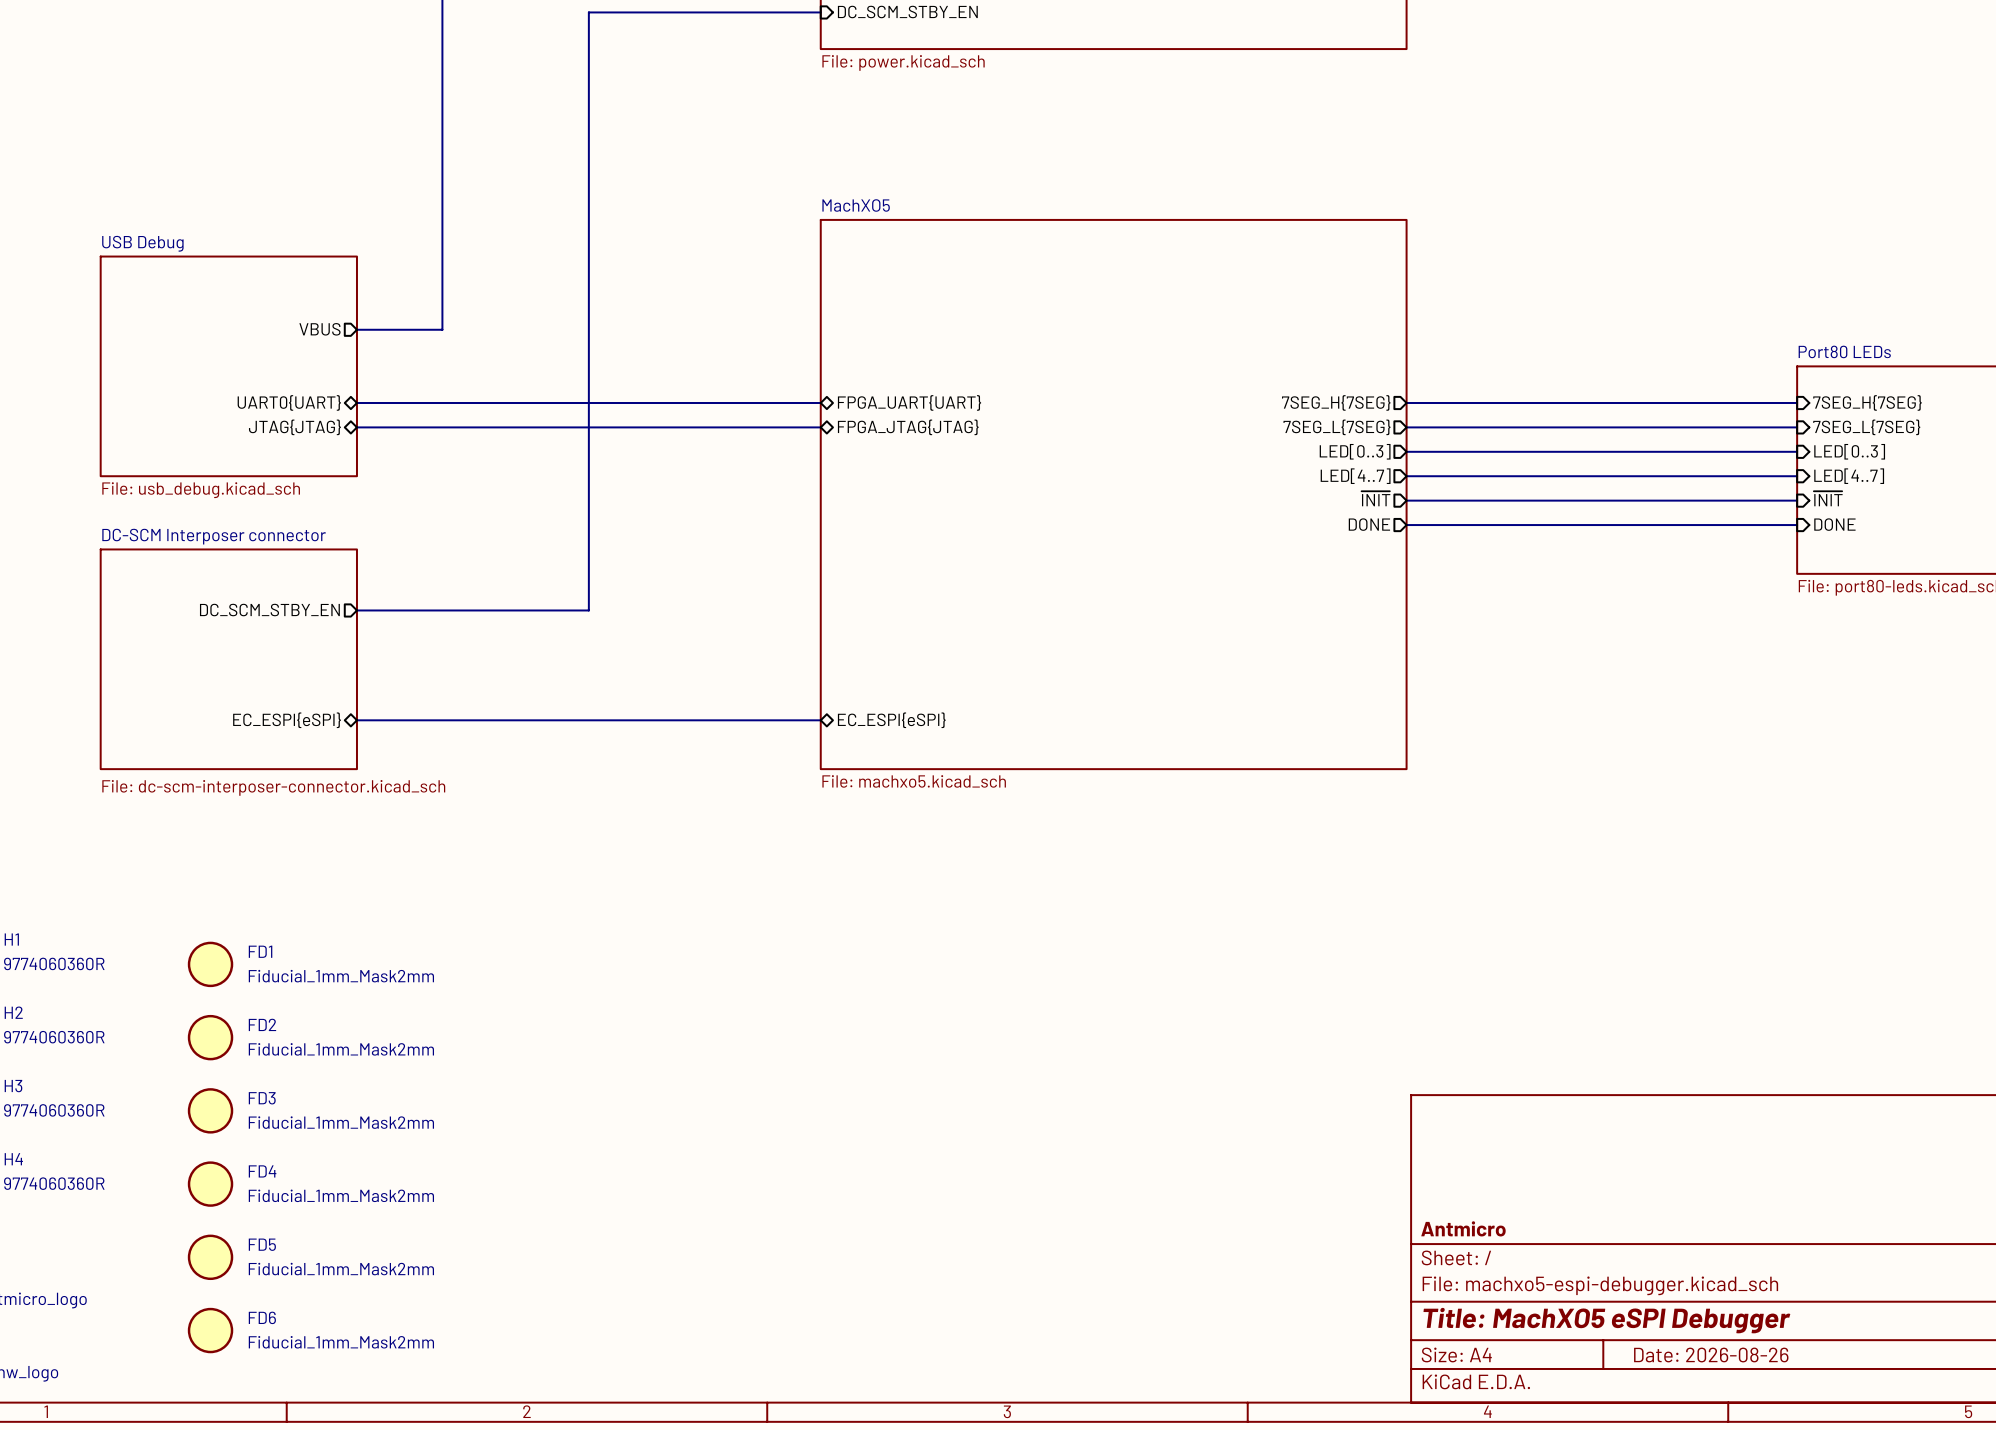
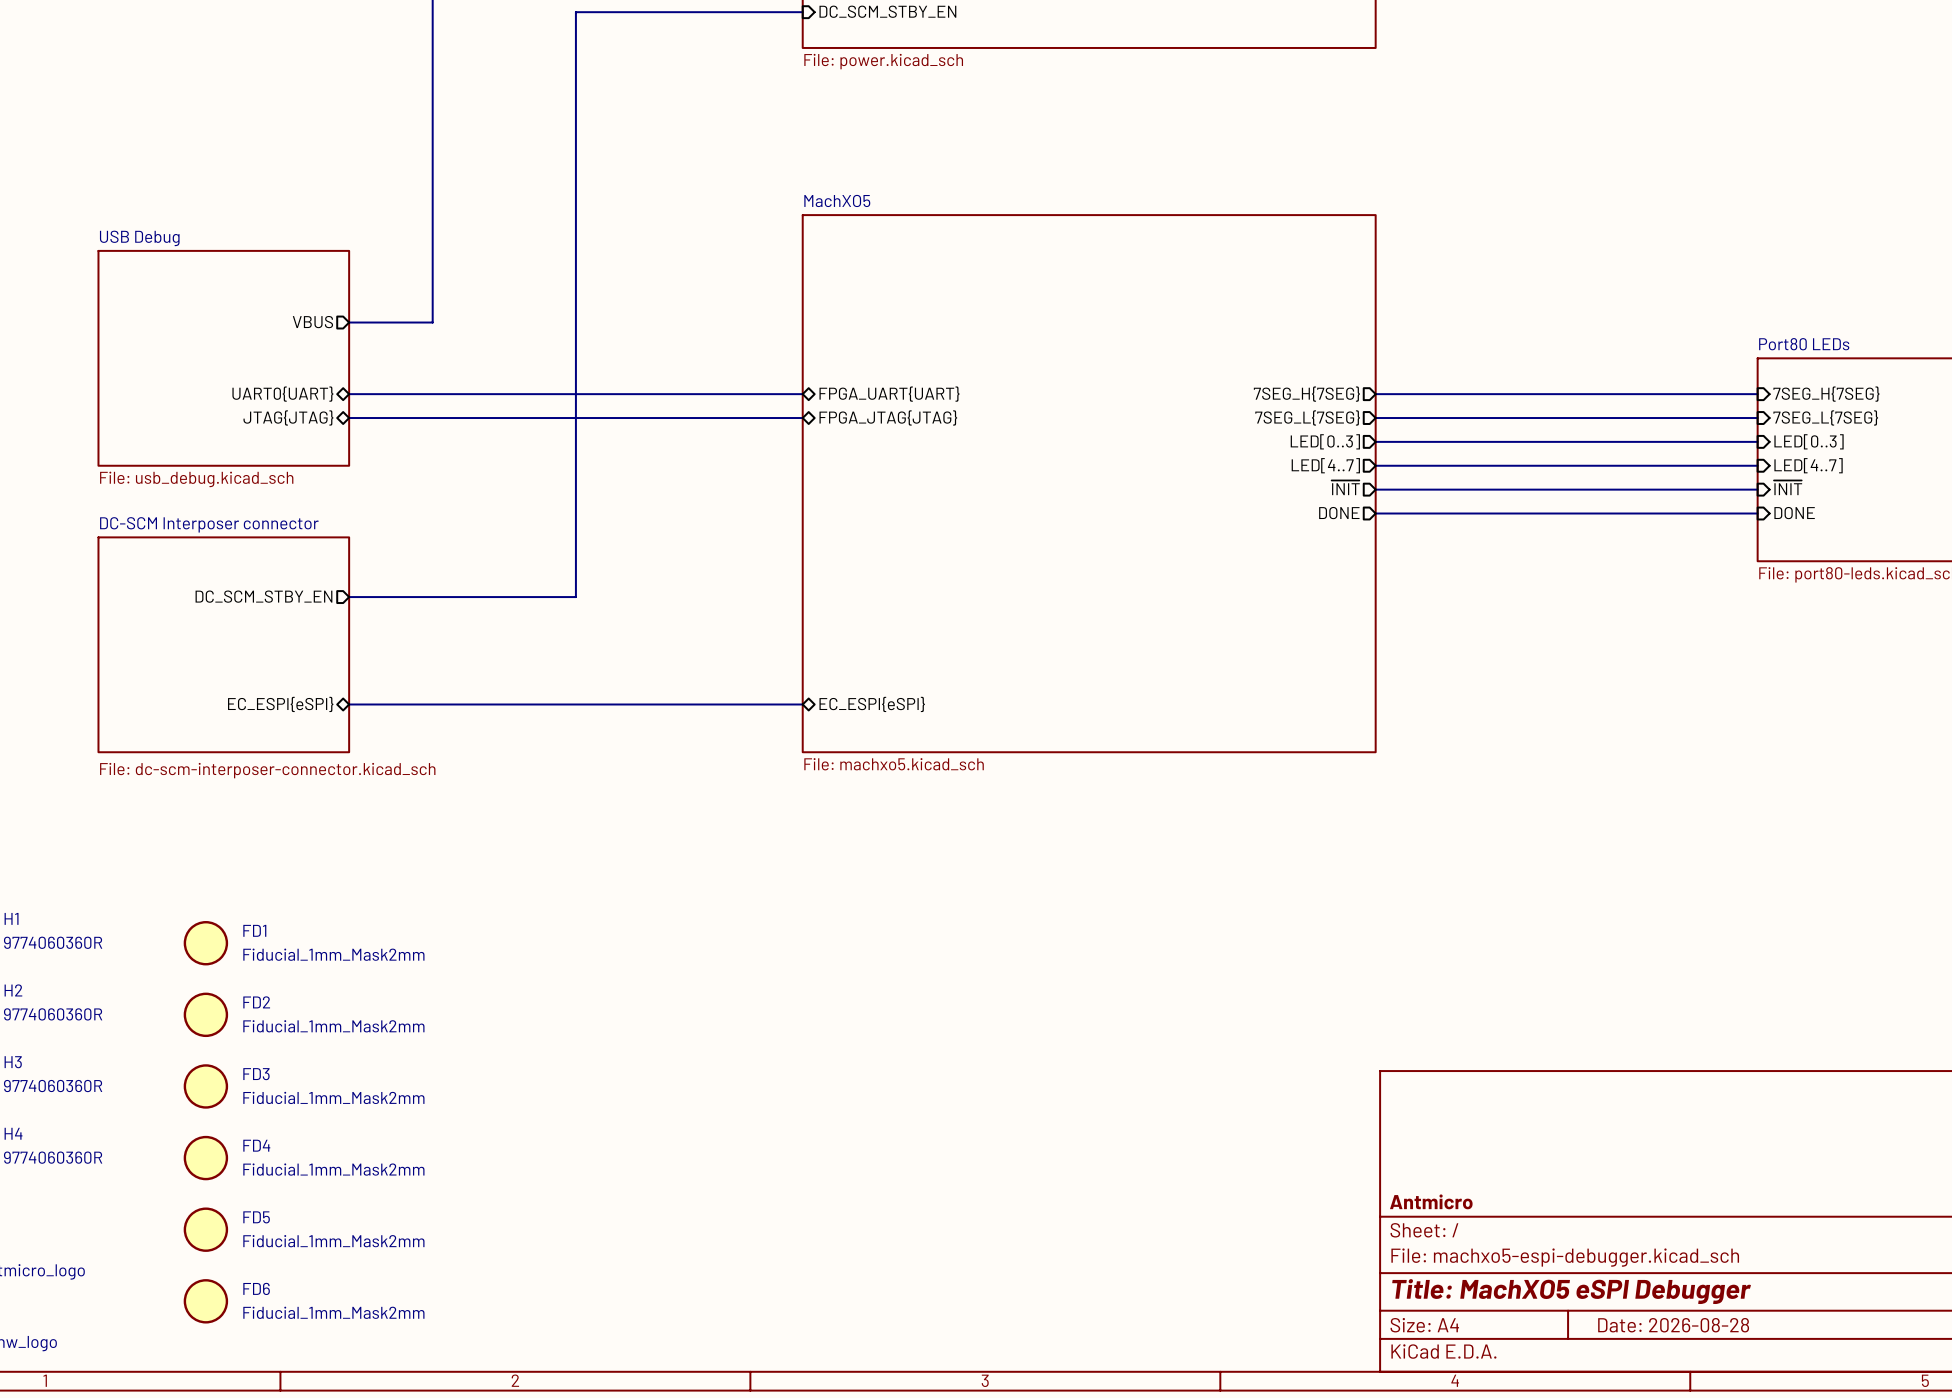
title block: Date: 2026-08-26 (1711, 1354) -> Date: 2026-08-28 (1673, 1325)

